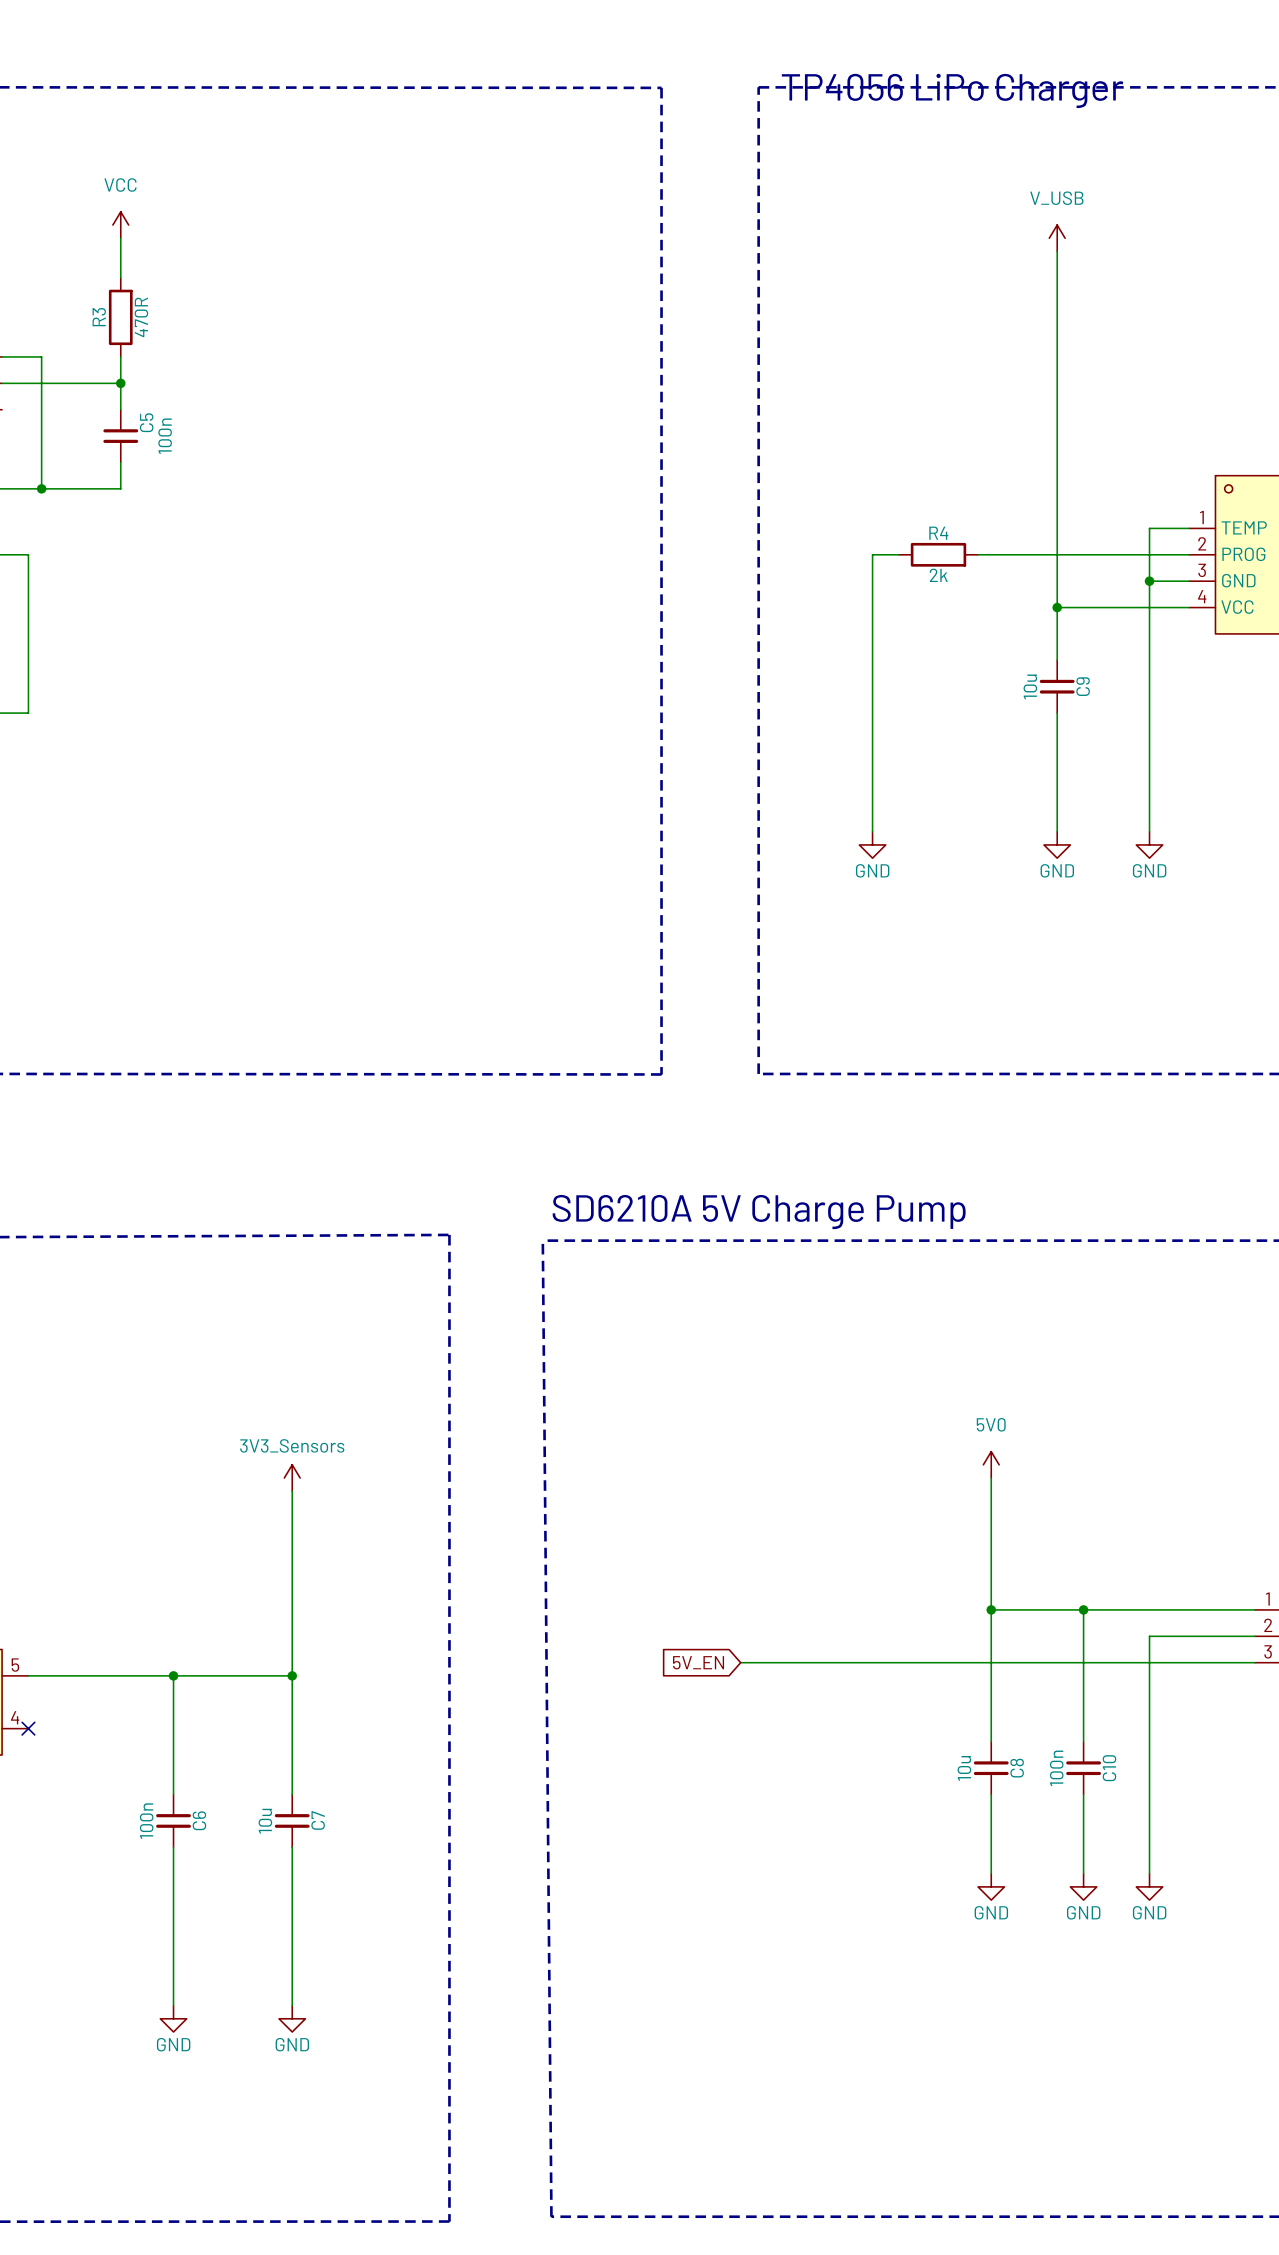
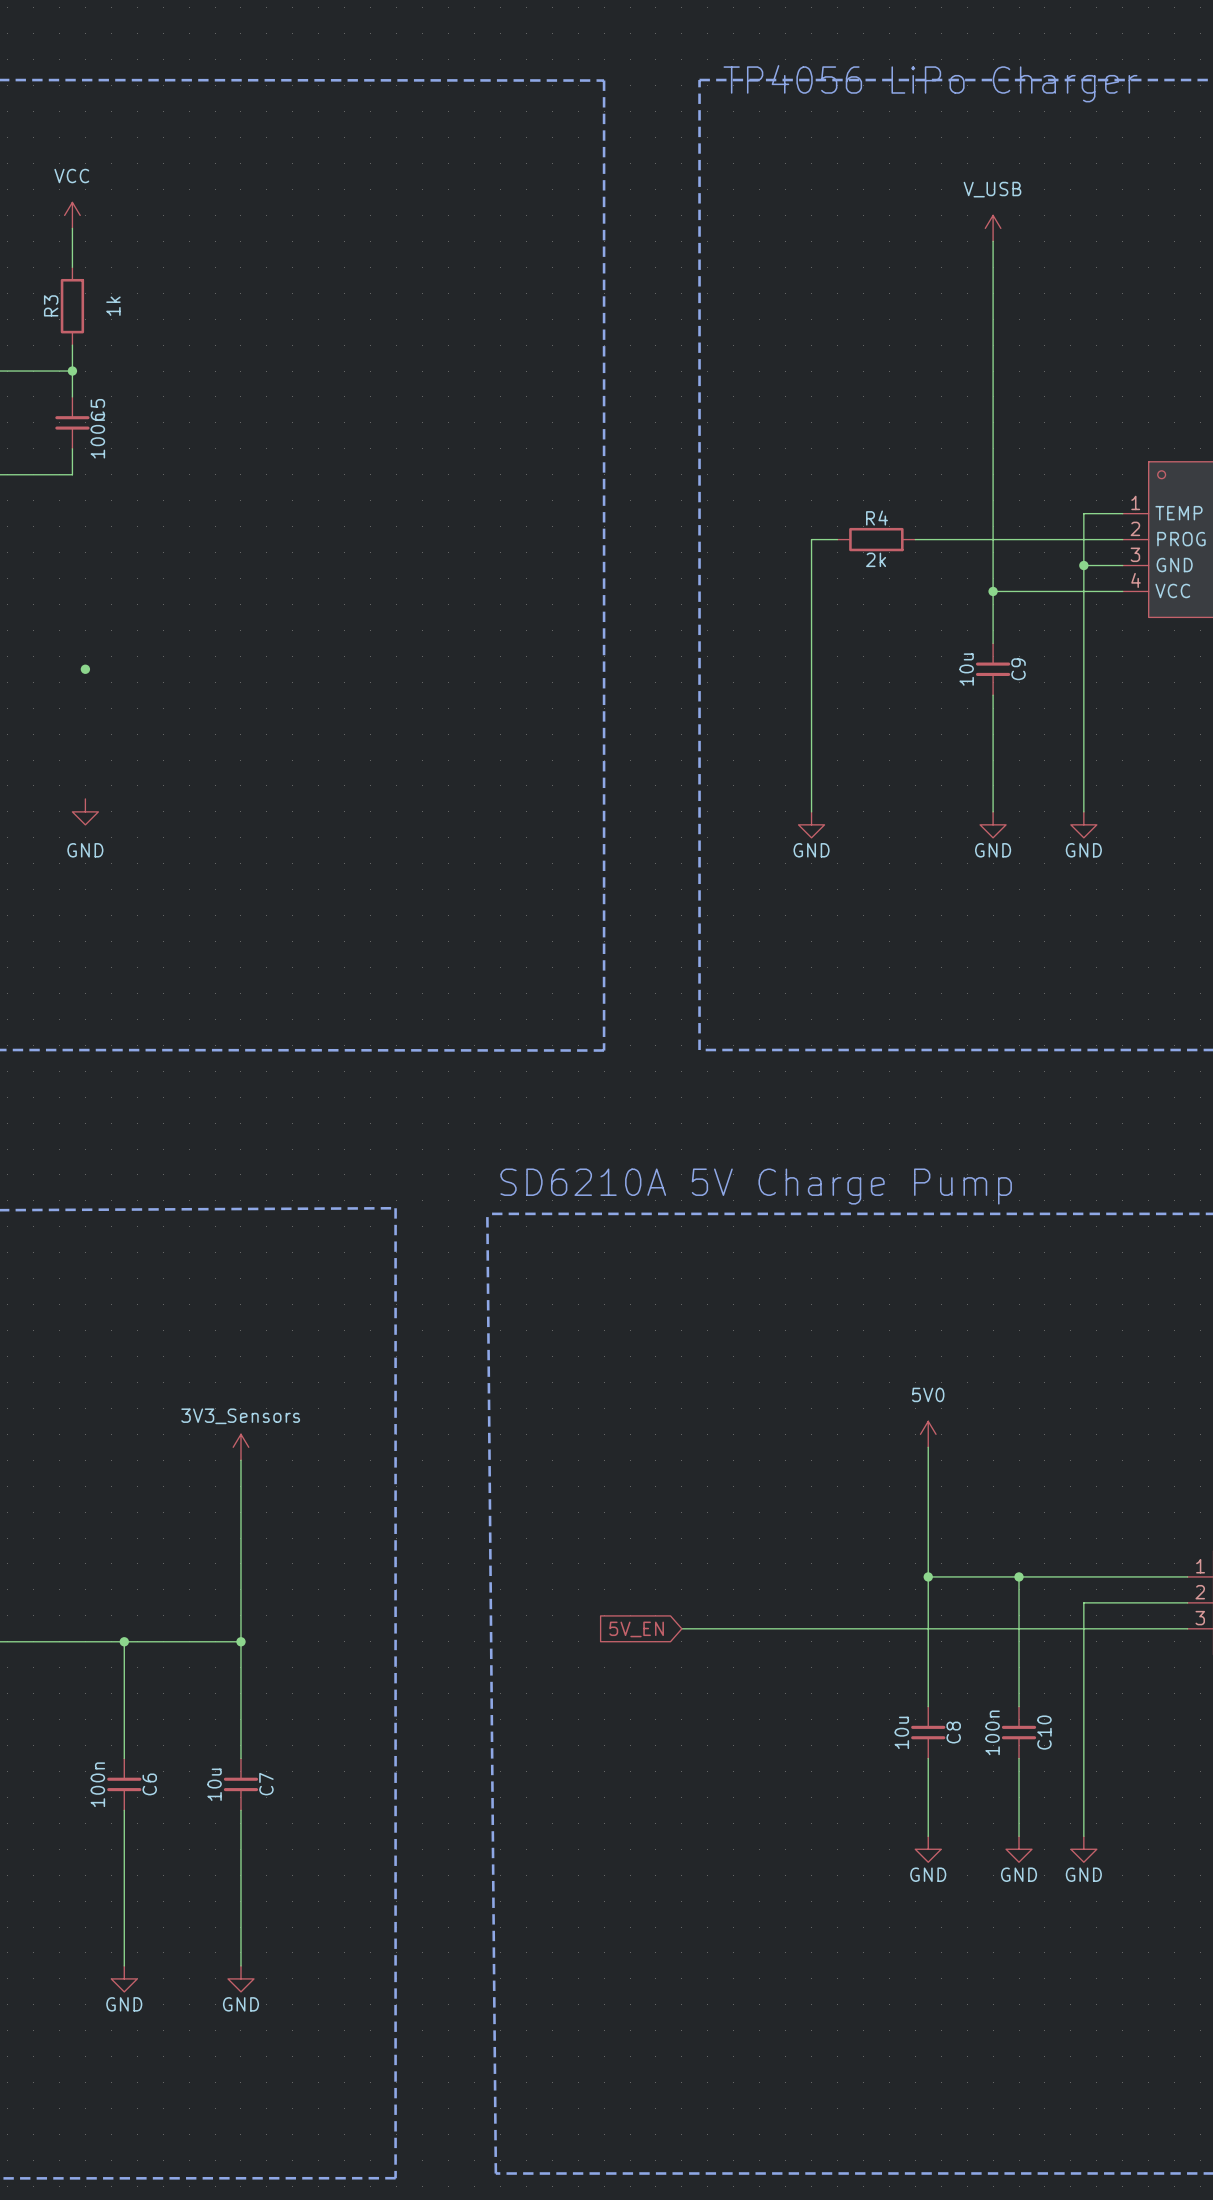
R3 value: 470R (141, 317) -> 1k (113, 306)
C5 value position: 100n (165, 436) -> 100n (97, 436)
junction: none -> (85, 669)
power symbol: none -> GND (85, 811)

